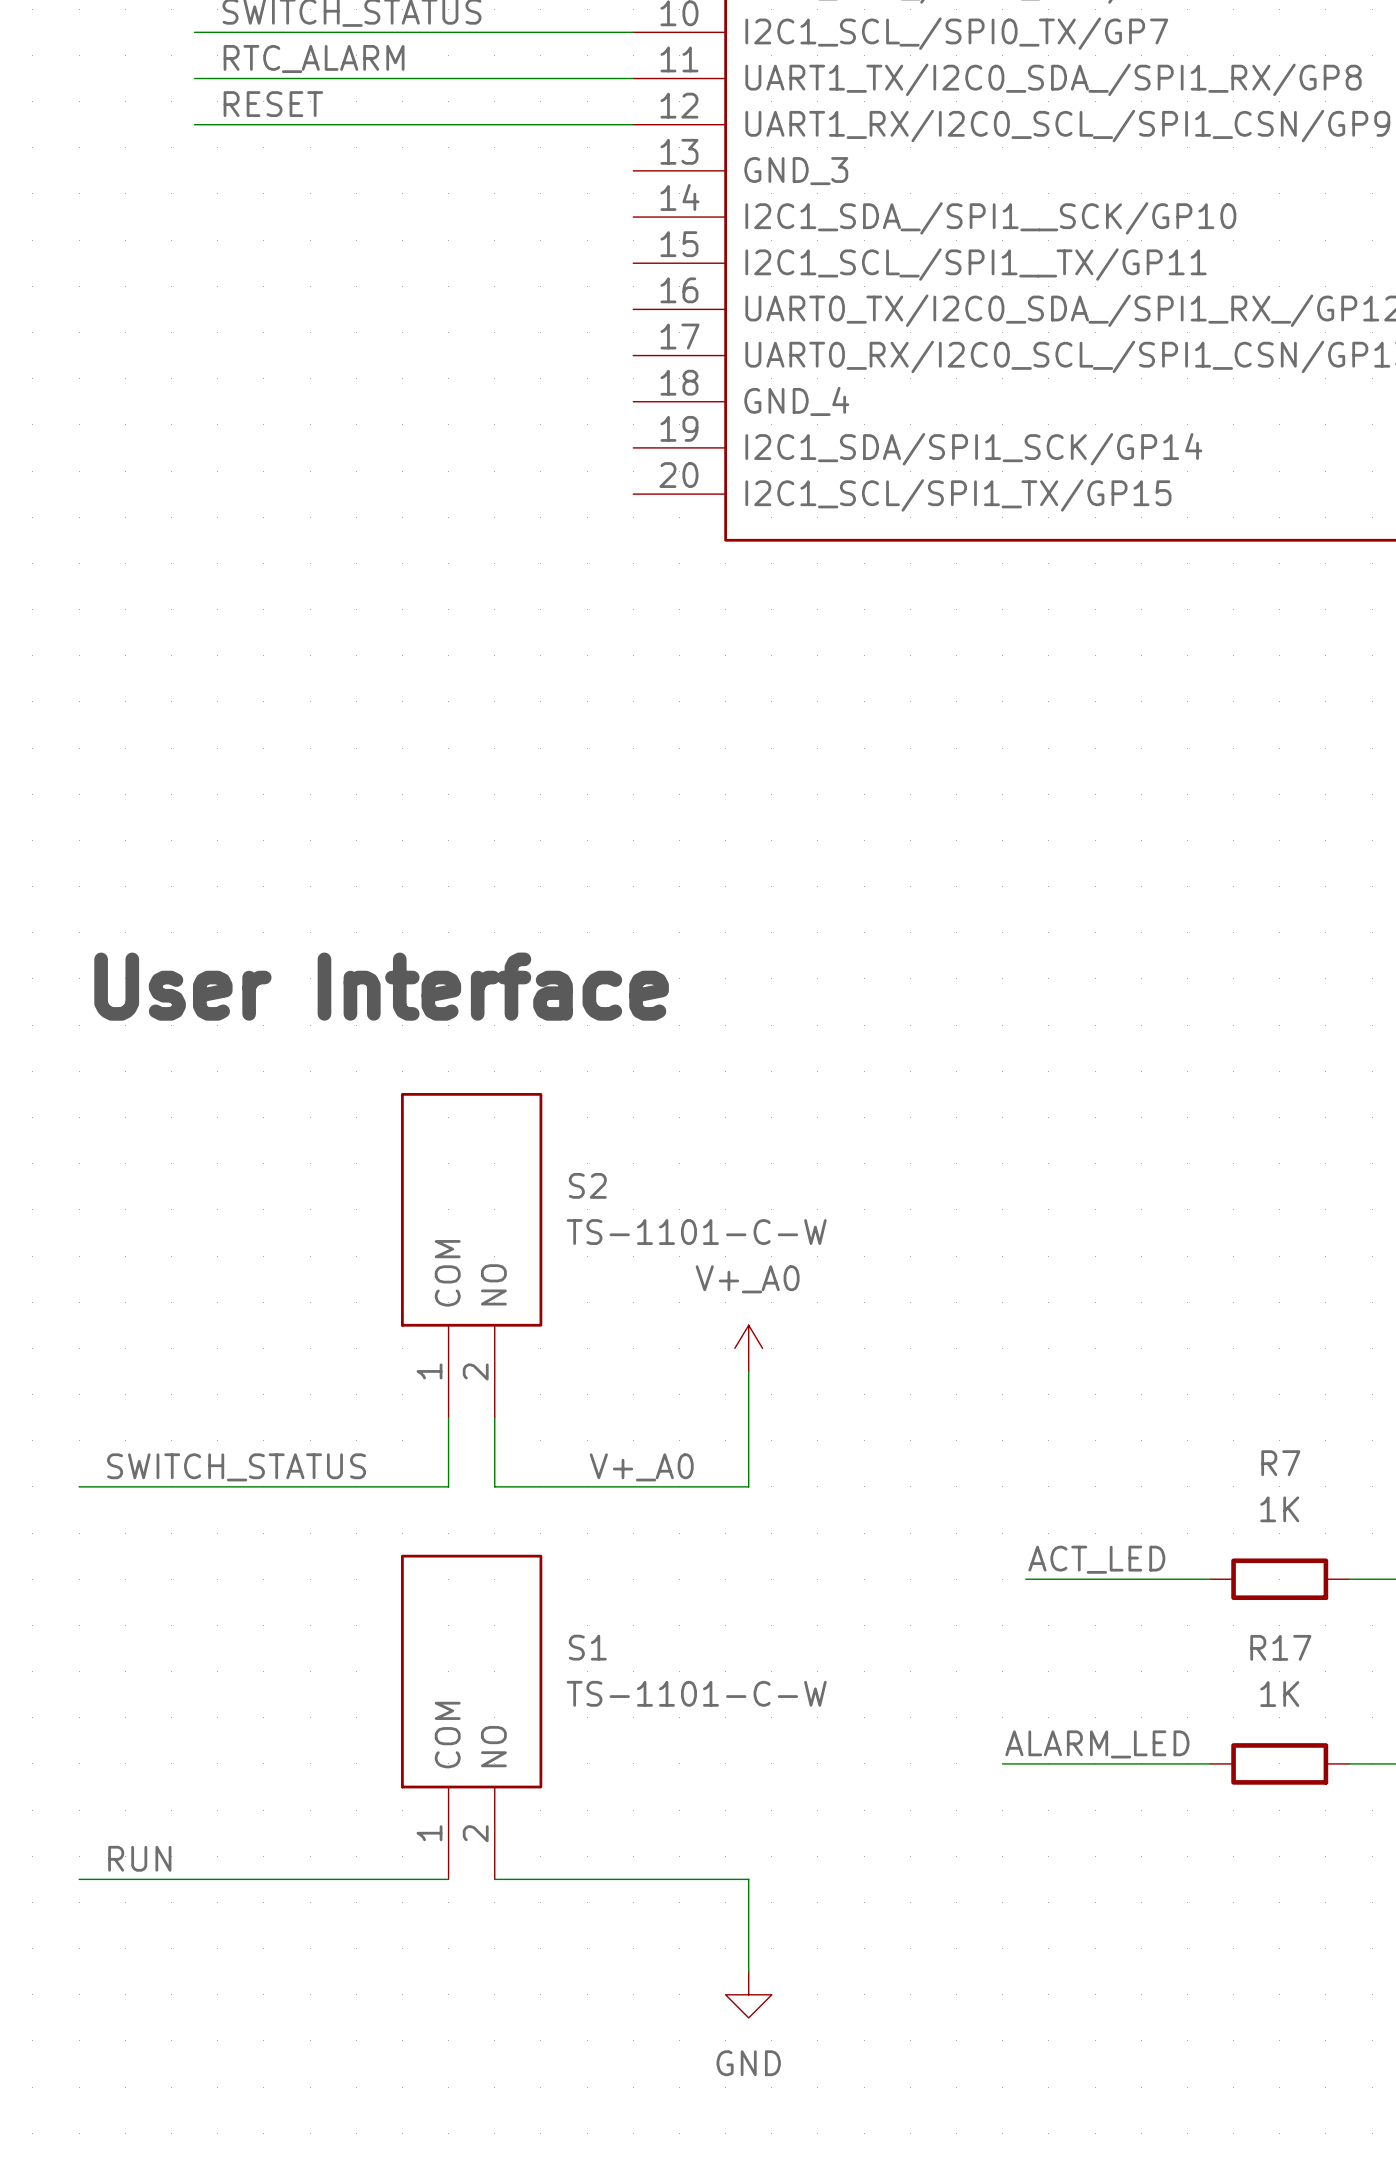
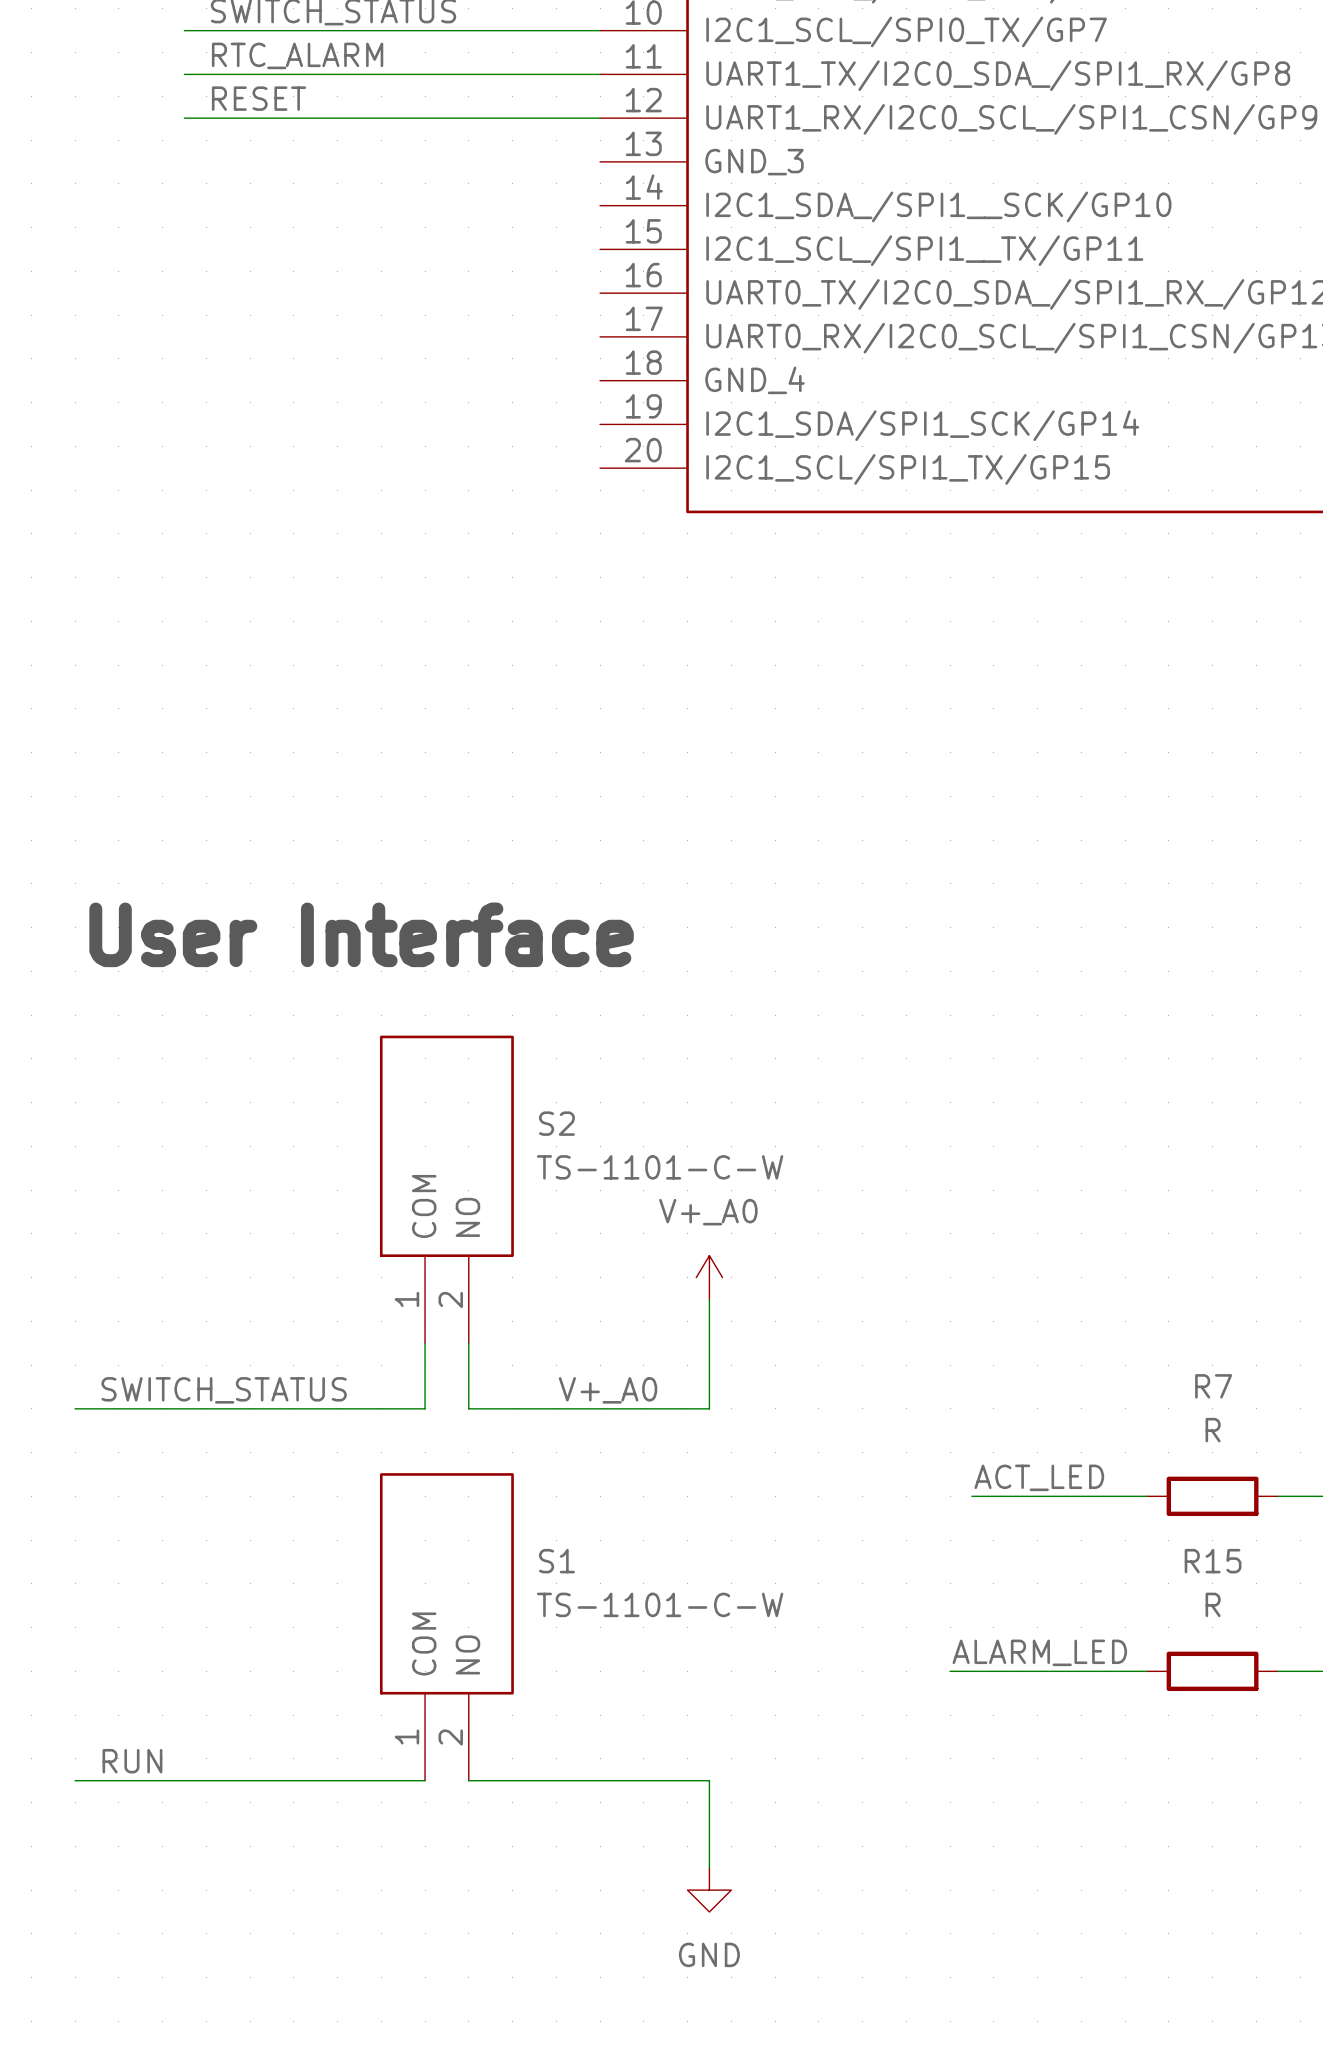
R7 value: 1K (1279, 1509) -> R (1213, 1430)
R17 name: R17 (1280, 1647) -> R15 (1213, 1561)
R17 value: 1K (1279, 1694) -> R (1213, 1604)

